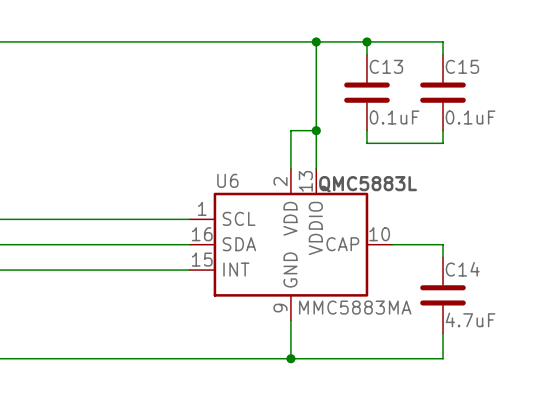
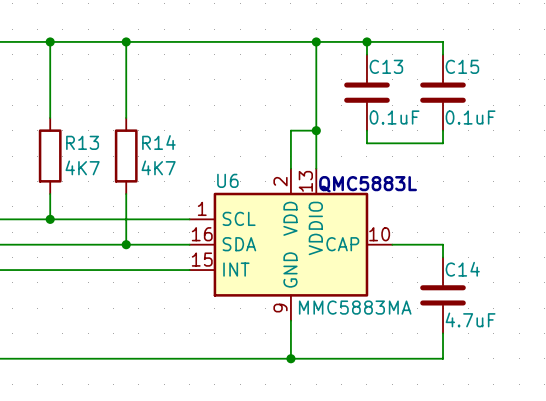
wire: none -> (50, 41) (50, 117)
junction: none -> (50, 41)
wire: none -> (126, 41) (126, 117)
junction: none -> (126, 41)
R13: none -> 4K7 (50, 156)
R14: none -> 4K7 (126, 156)
wire: none -> (50, 194) (50, 219)
wire: none -> (126, 194) (126, 244)
junction: none -> (50, 219)
junction: none -> (126, 244)

